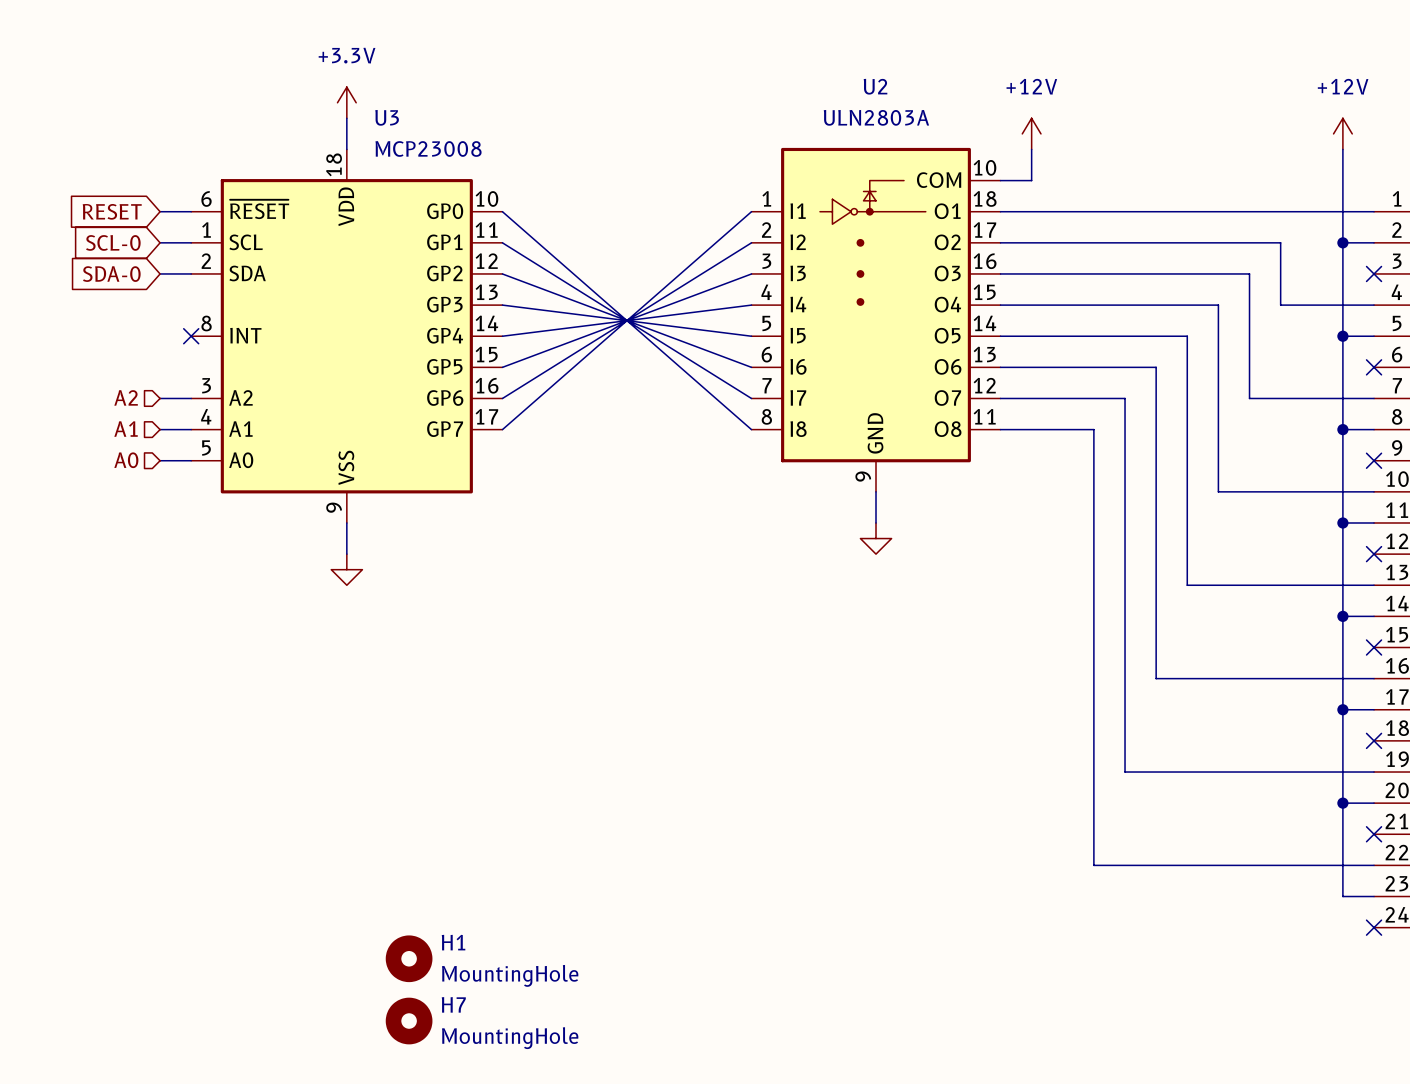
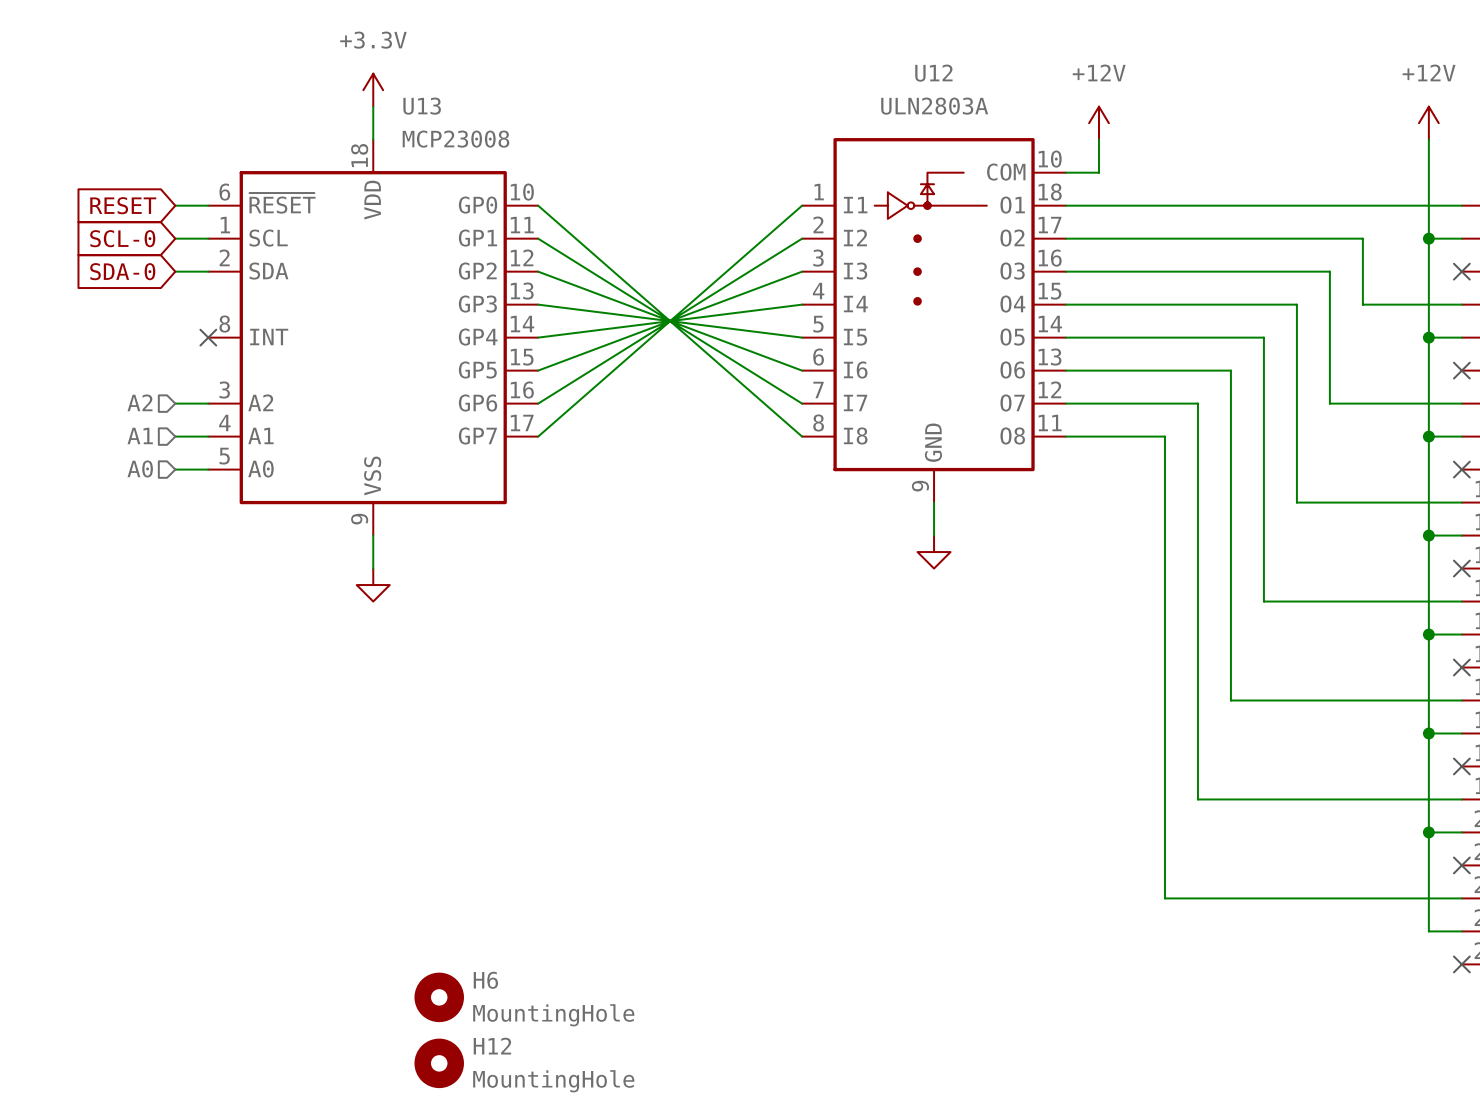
U2 name: U2 (875, 86) -> U12 (933, 73)
U3 name: U3 (387, 117) -> U13 (422, 106)
H1 name: H1 (453, 942) -> H6 (485, 980)
H7 name: H7 (453, 1004) -> H12 (492, 1046)

